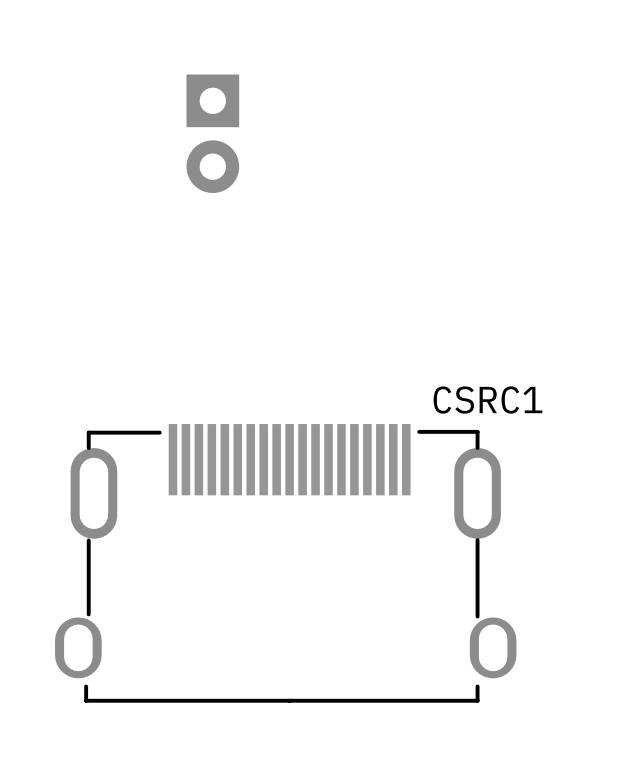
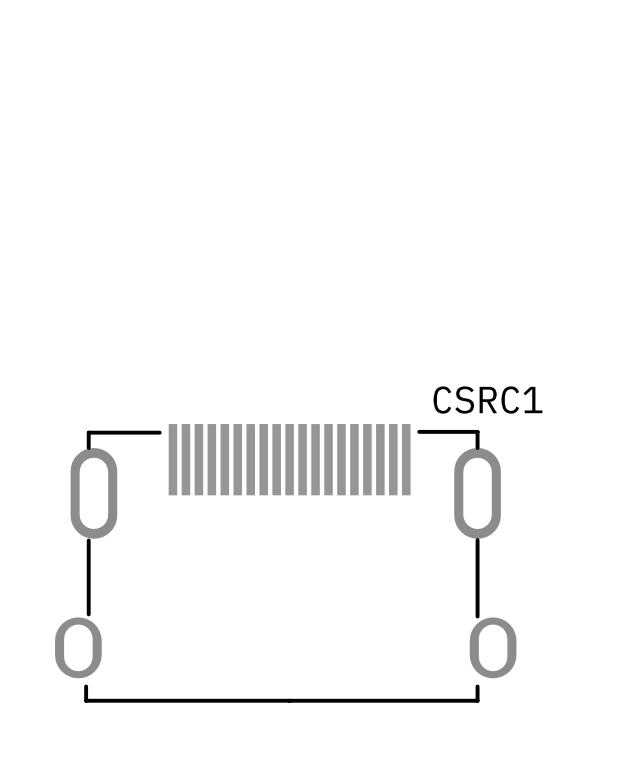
part: (212, 133) -> none

